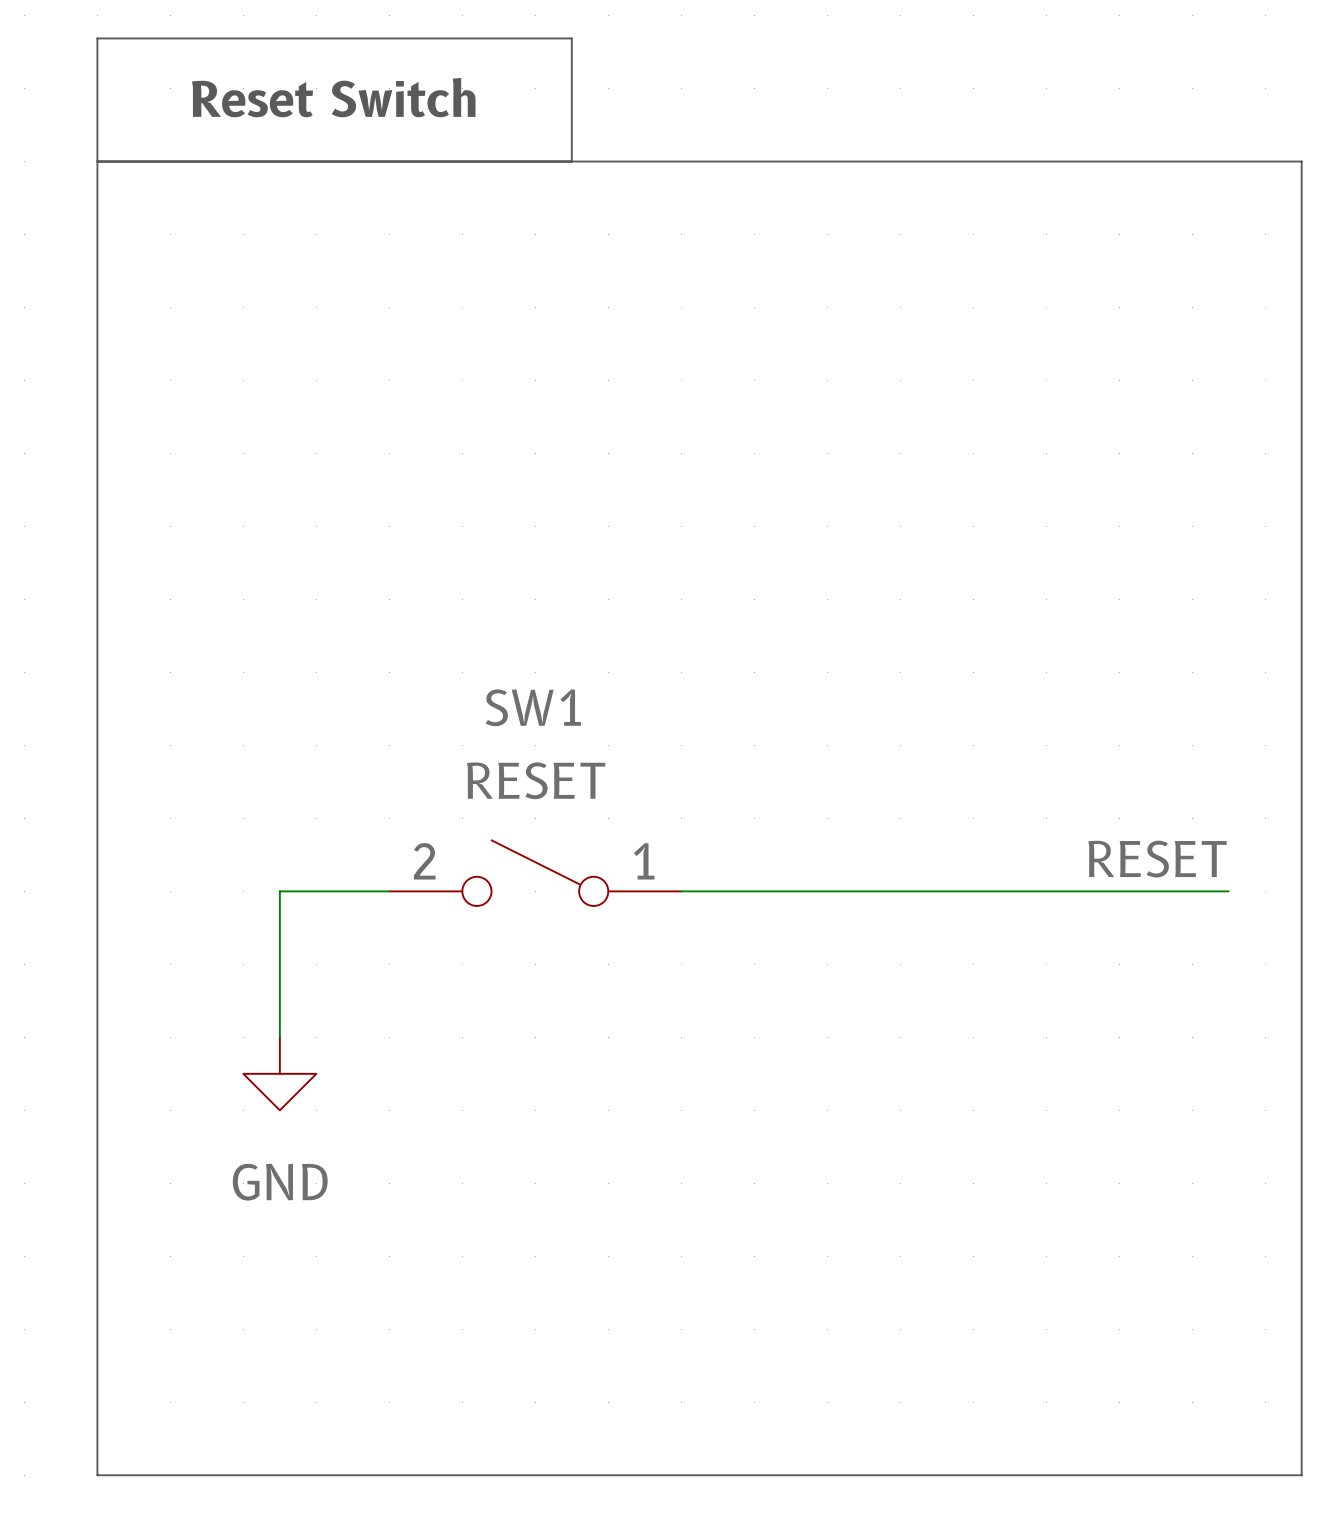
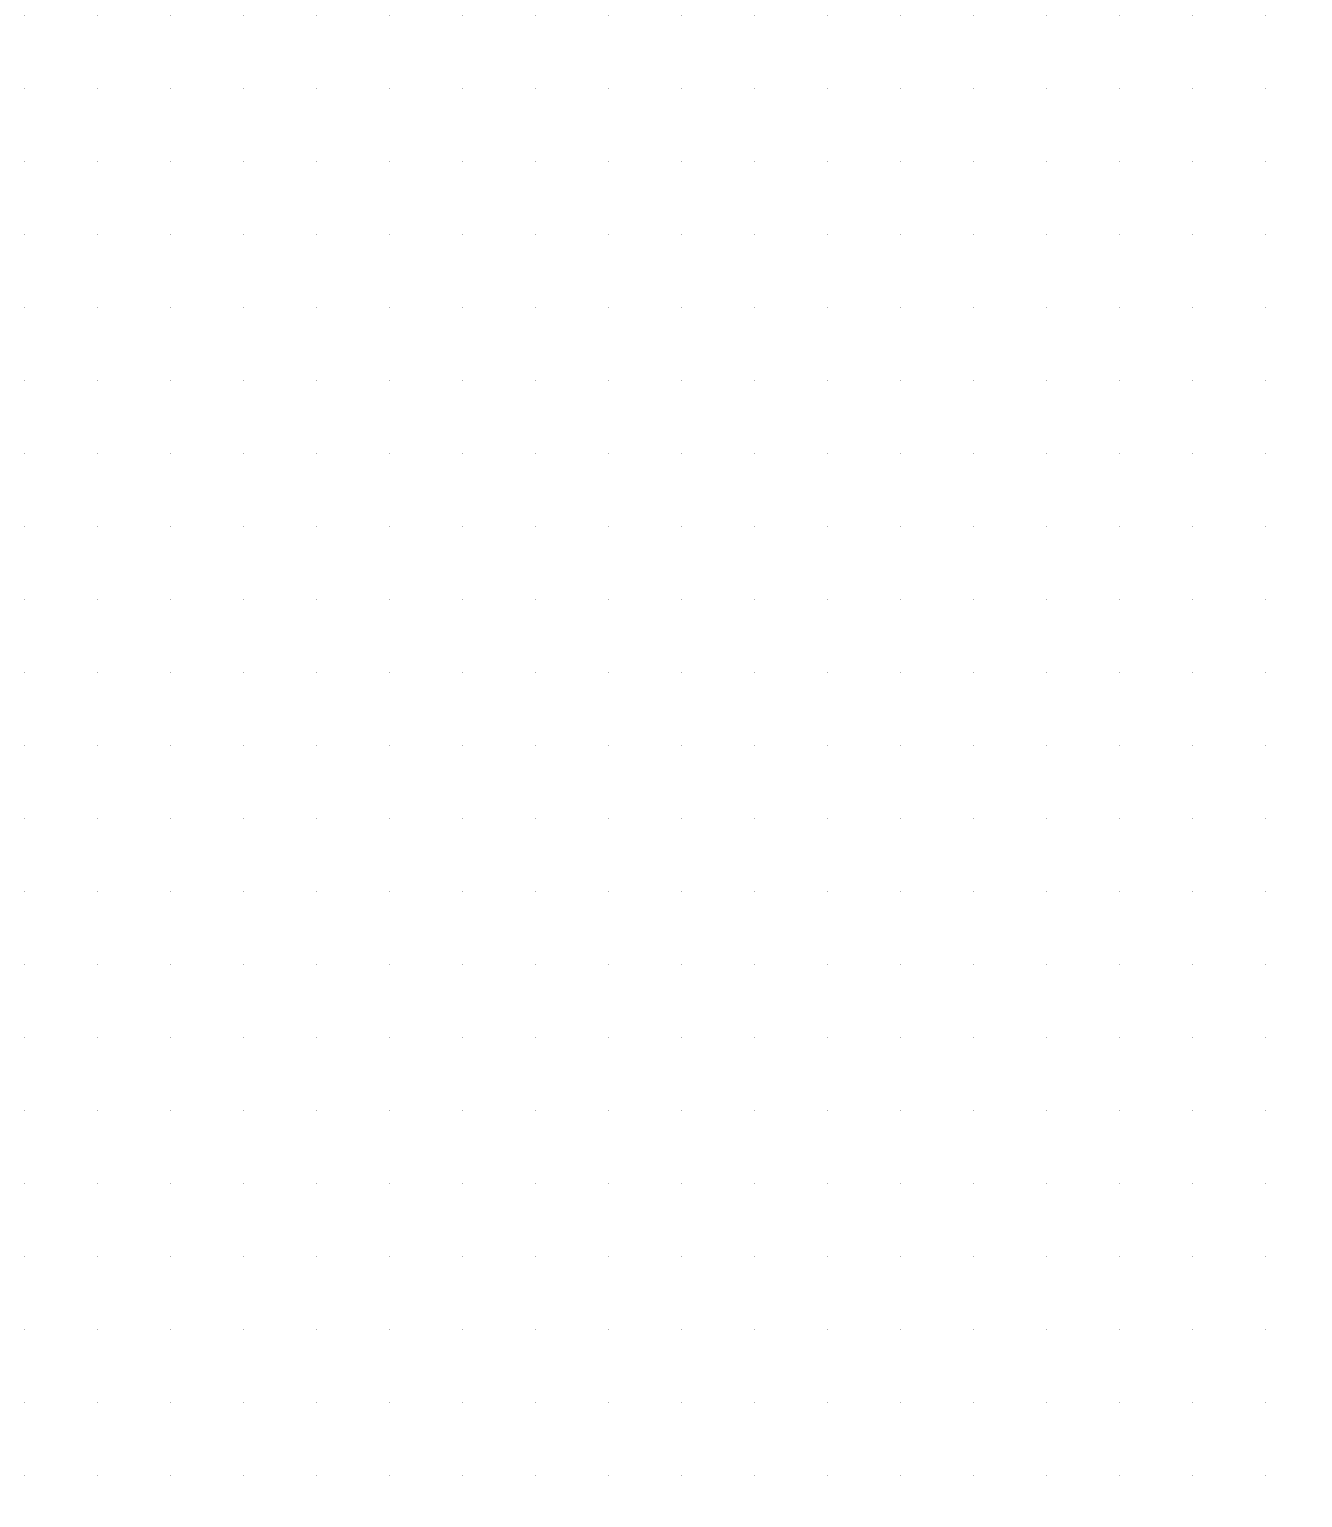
text: Reset Switch (333, 97) -> none
line: (97, 161) (1301, 161) (1301, 1475) (97, 1475) (97, 38) (571, 38) (571, 161) -> none
label: RESET (1157, 859) -> none
SW1: RESET (535, 873) -> none
wire: (389, 891) (279, 891) (279, 1037) -> none
wire: (681, 891) (1228, 891) -> none
power symbol: GND (279, 1073) -> none

